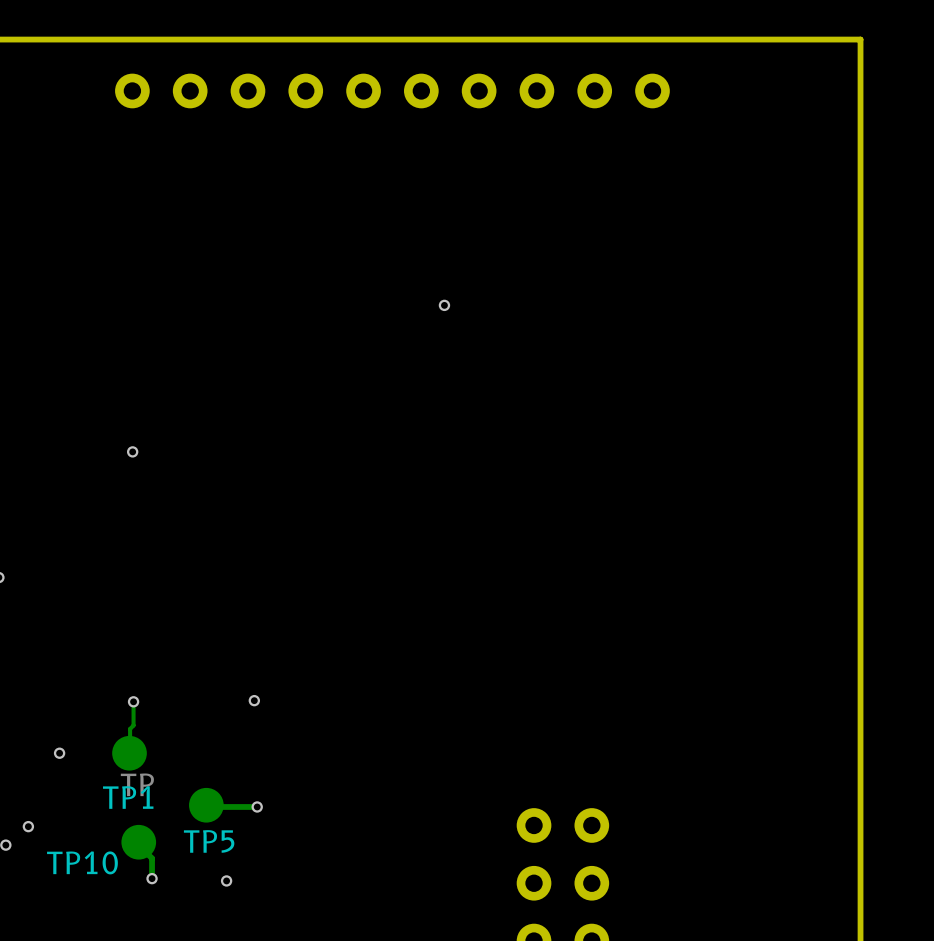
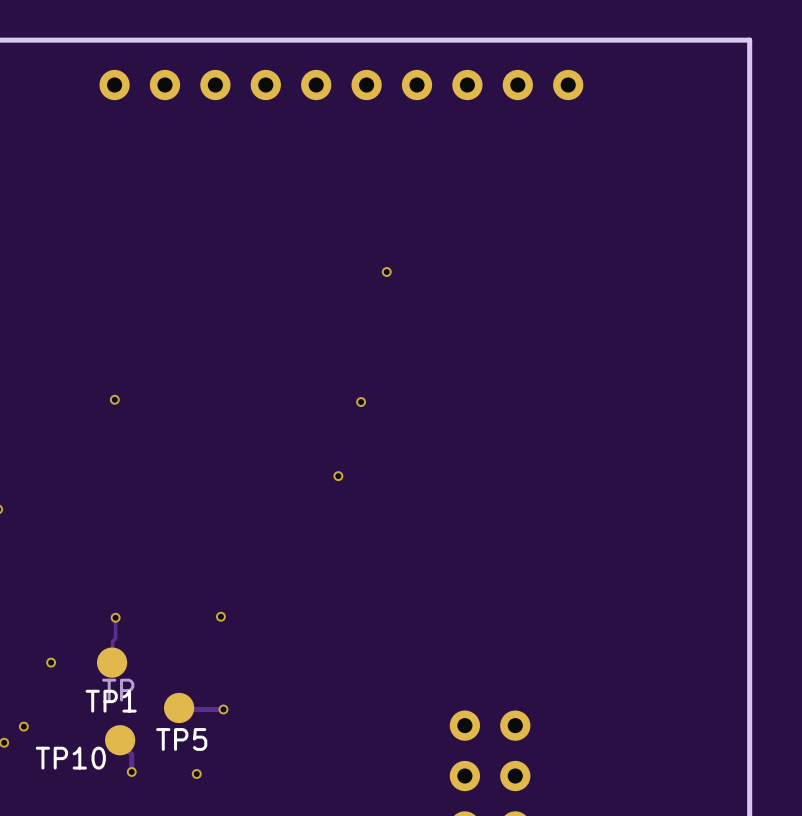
via: none -> (361, 402)
via: none -> (338, 476)

